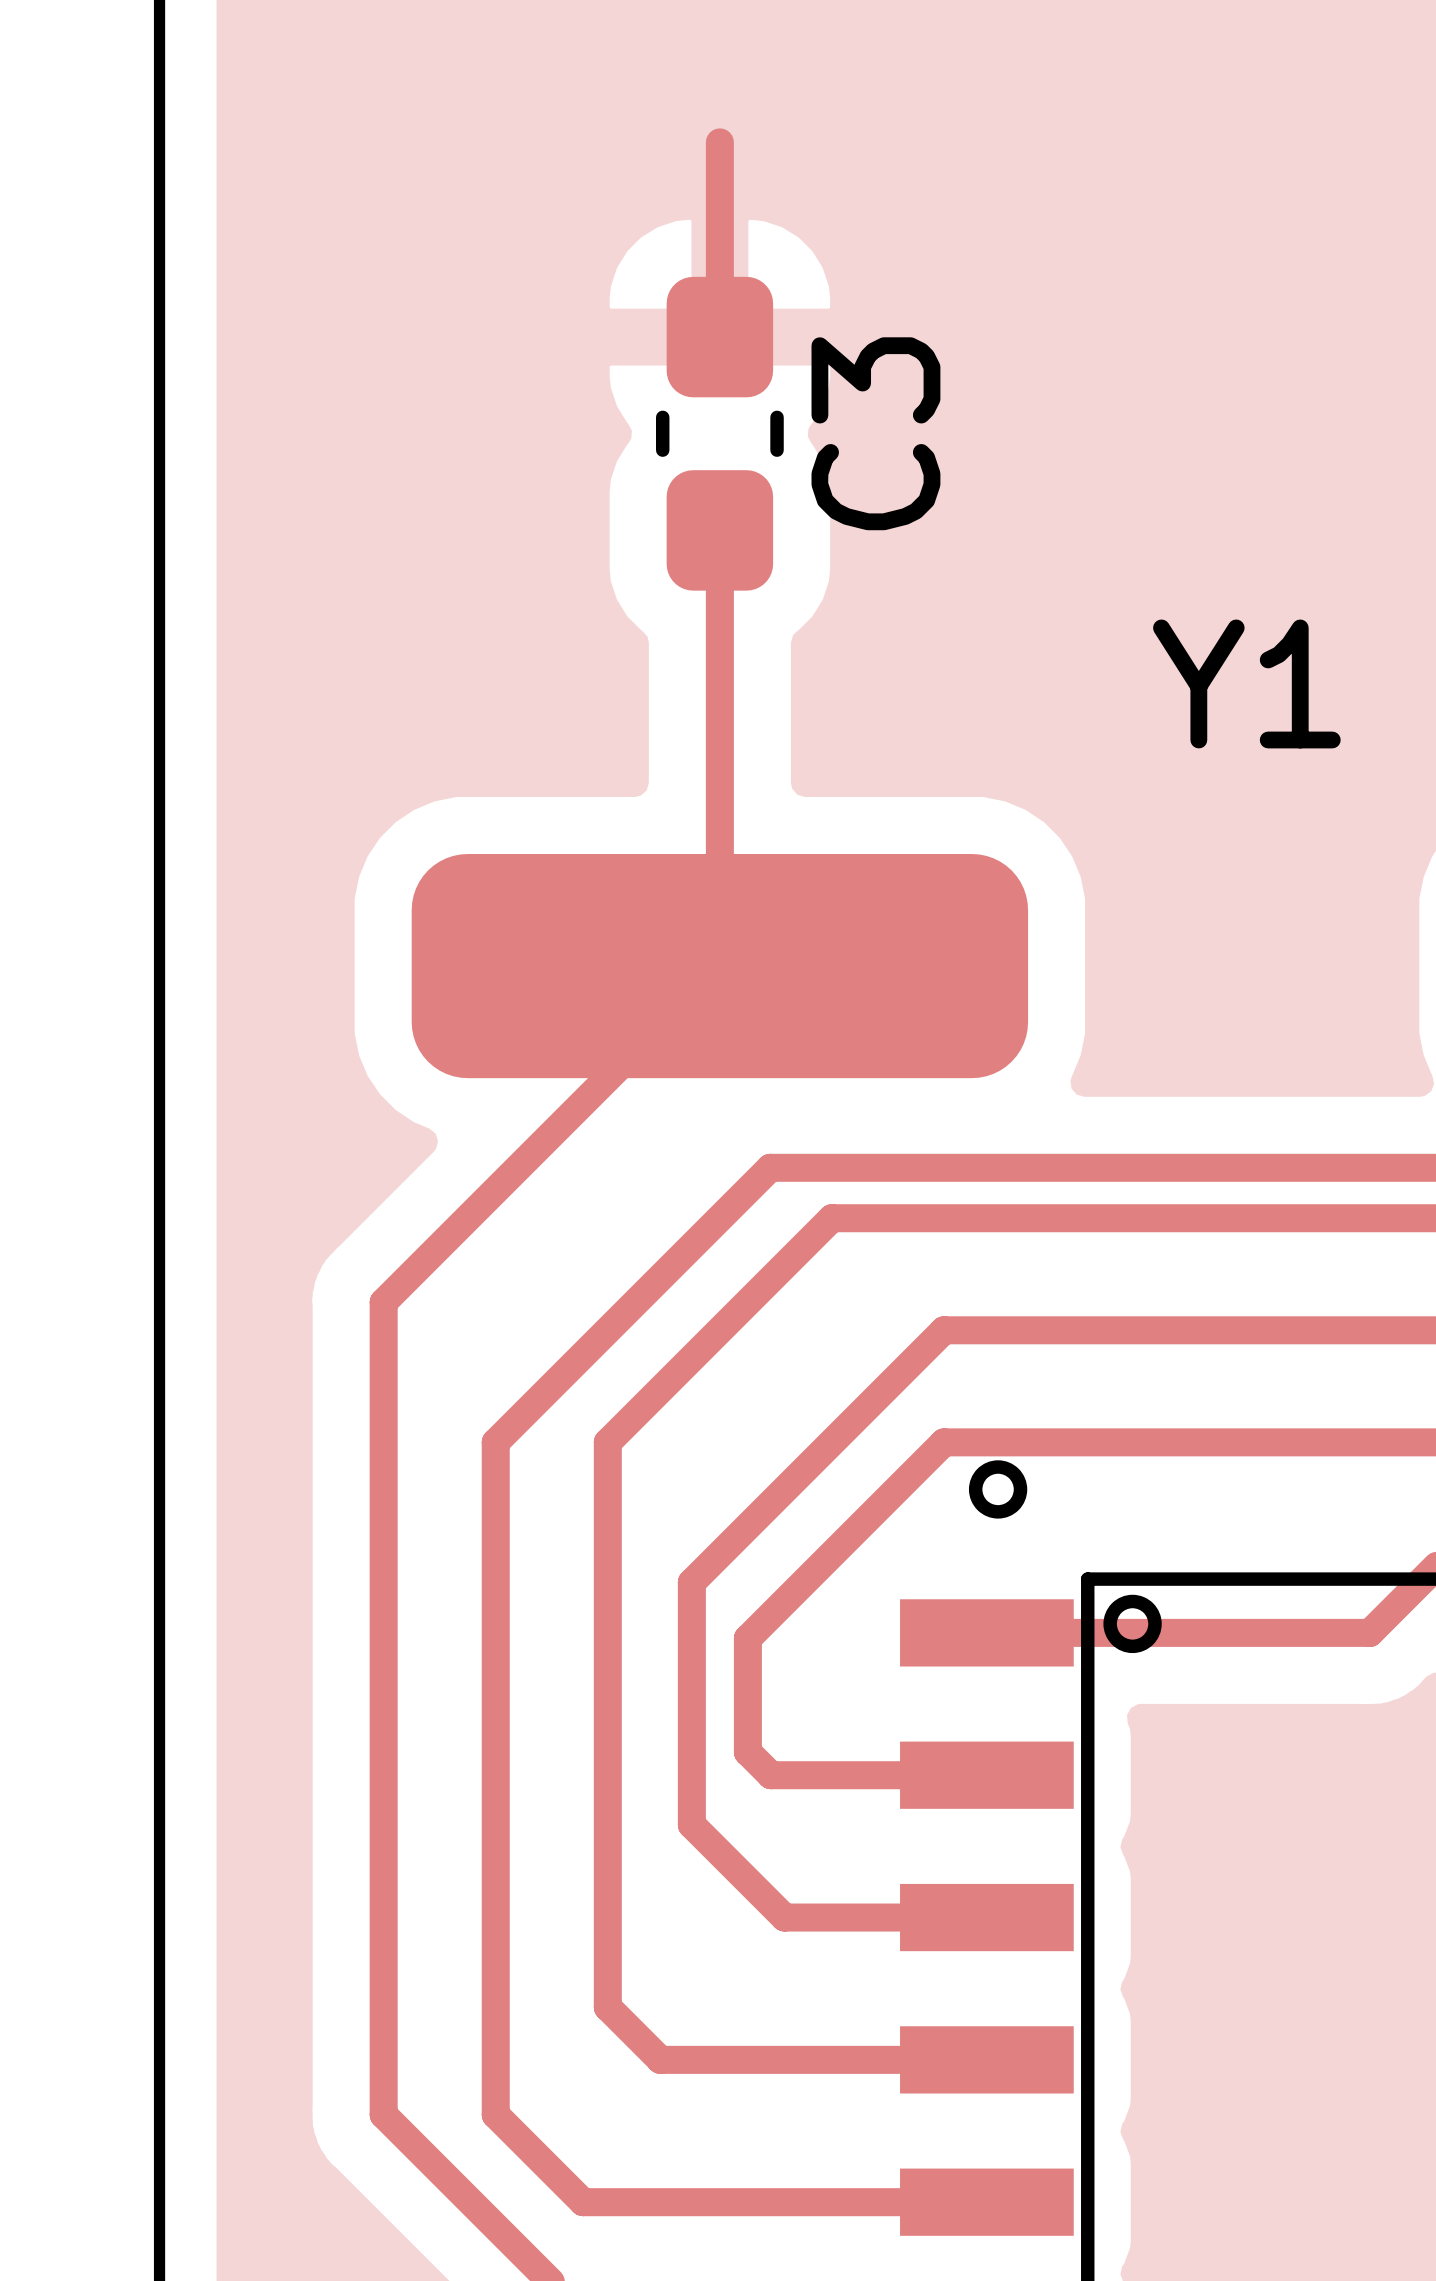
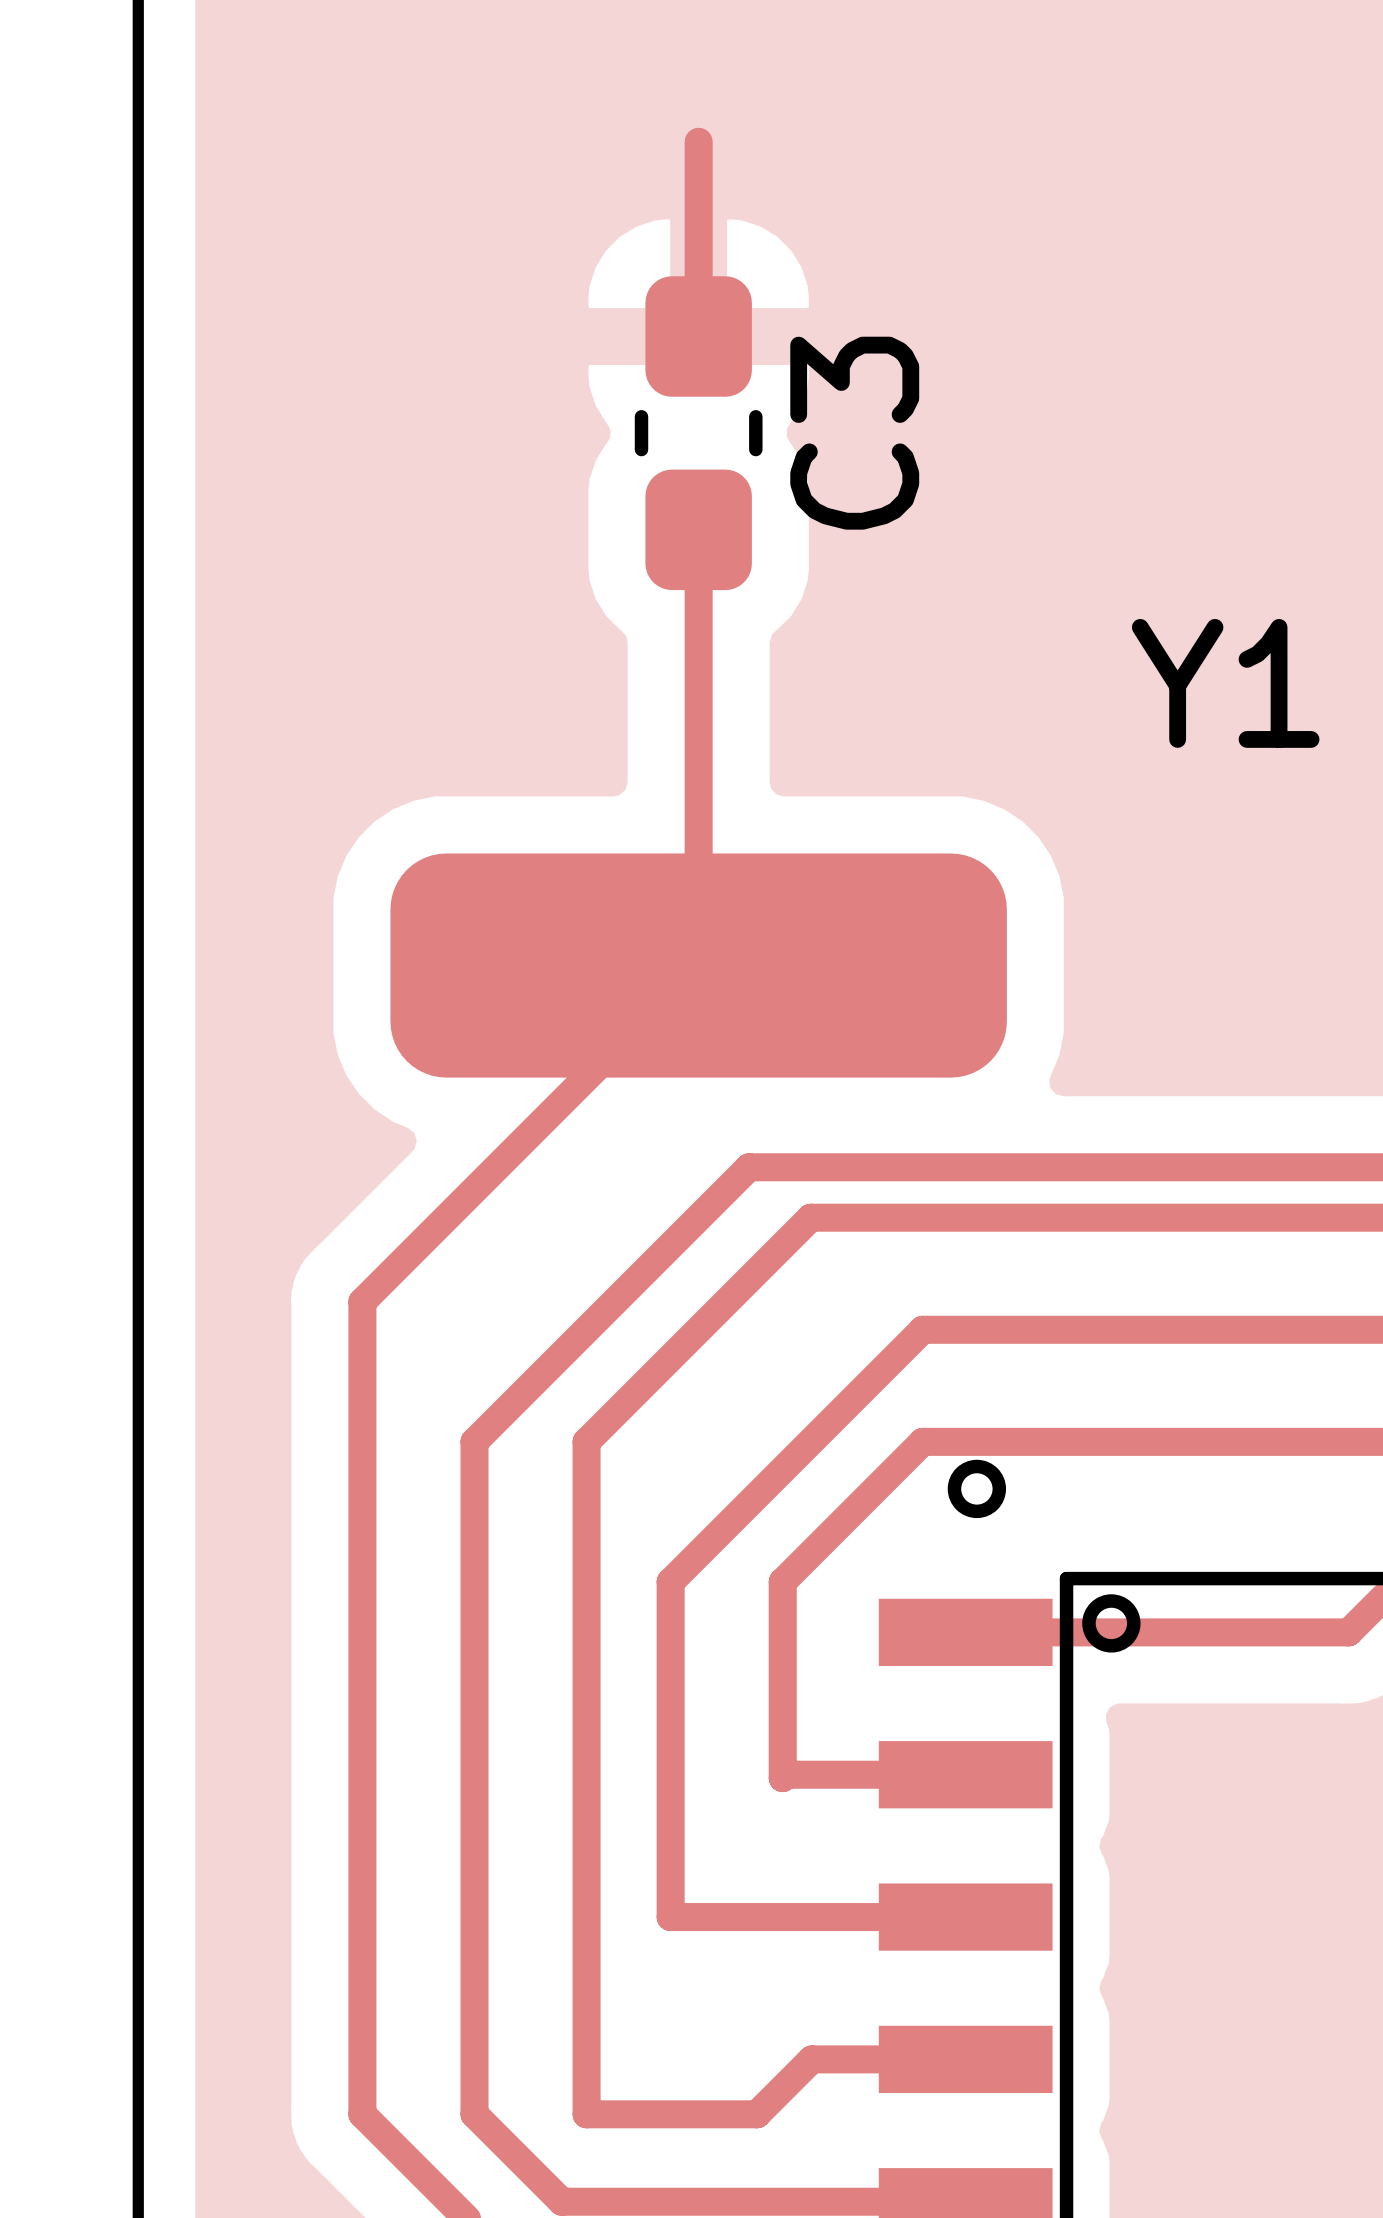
track: (803, 1582) (747, 1638) (747, 1752) (771, 1775) (807, 1775) -> (782, 1581) (782, 1778) (786, 1774)
track: (691, 1824) (784, 1917) -> (670, 1824) (670, 1917) (763, 1917)
track: (607, 2007) (660, 2059) (833, 2059) -> (586, 2006) (586, 2114) (756, 2114) (811, 2059)

